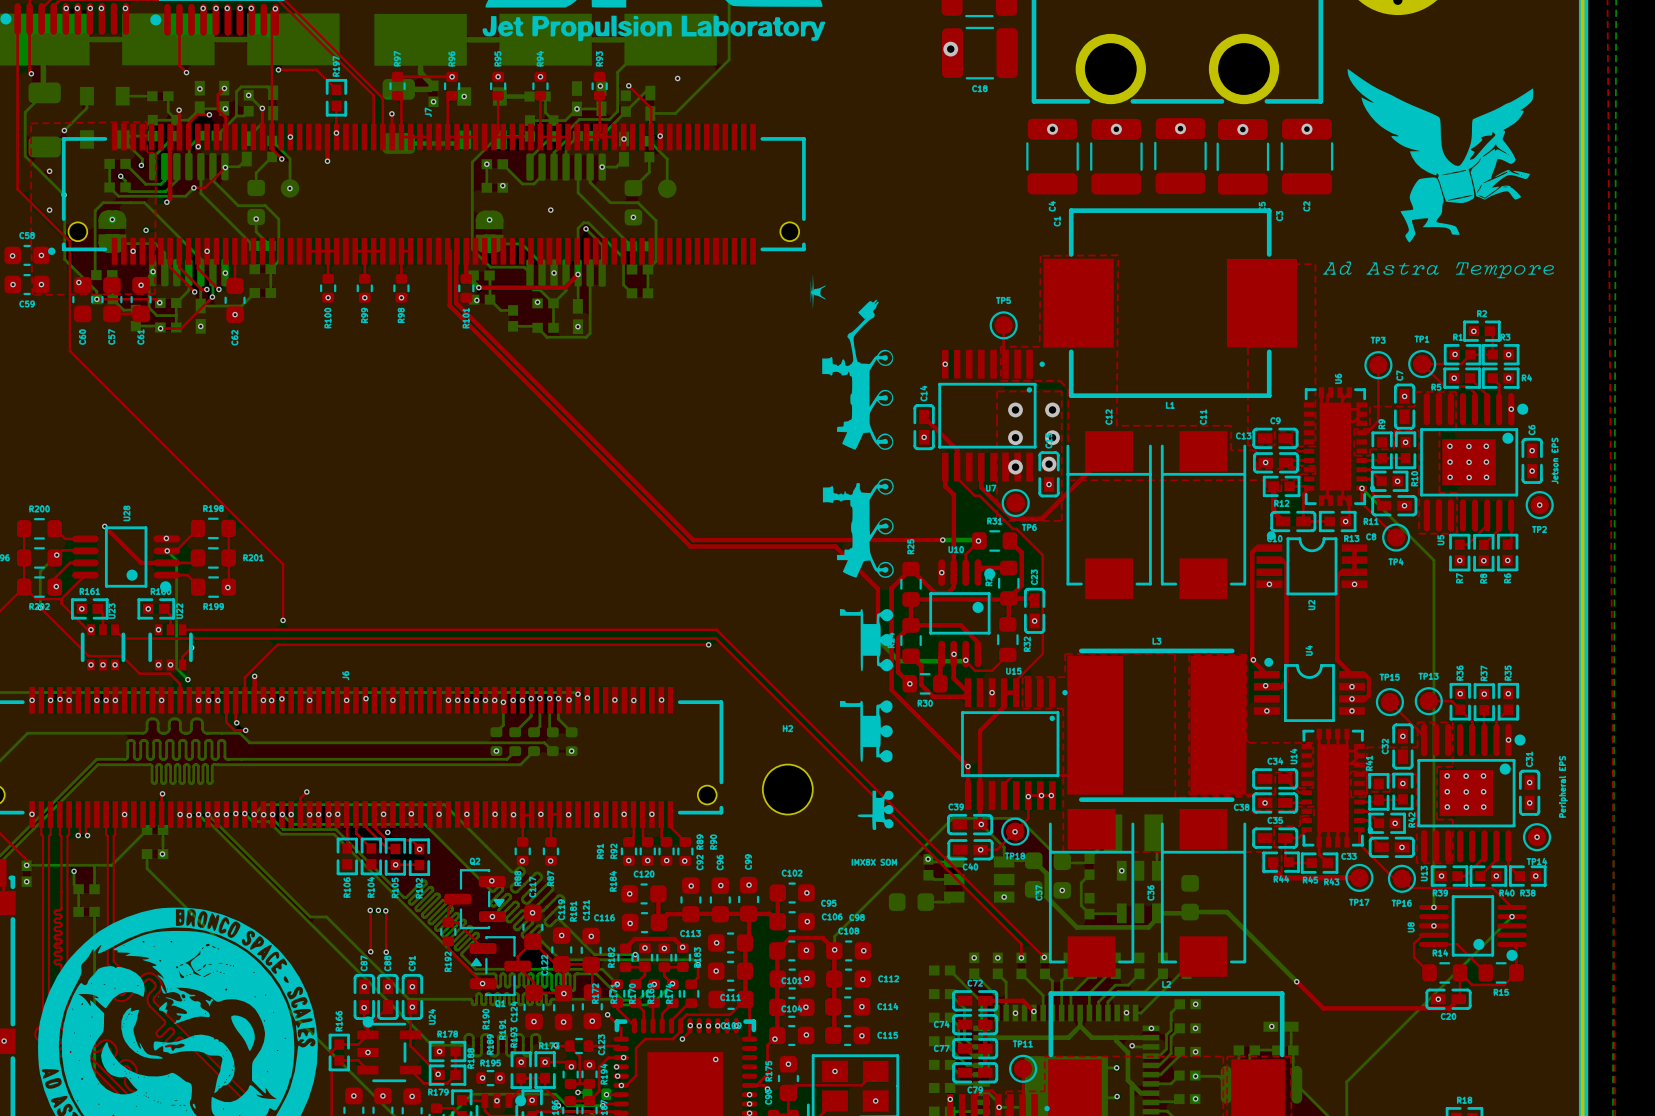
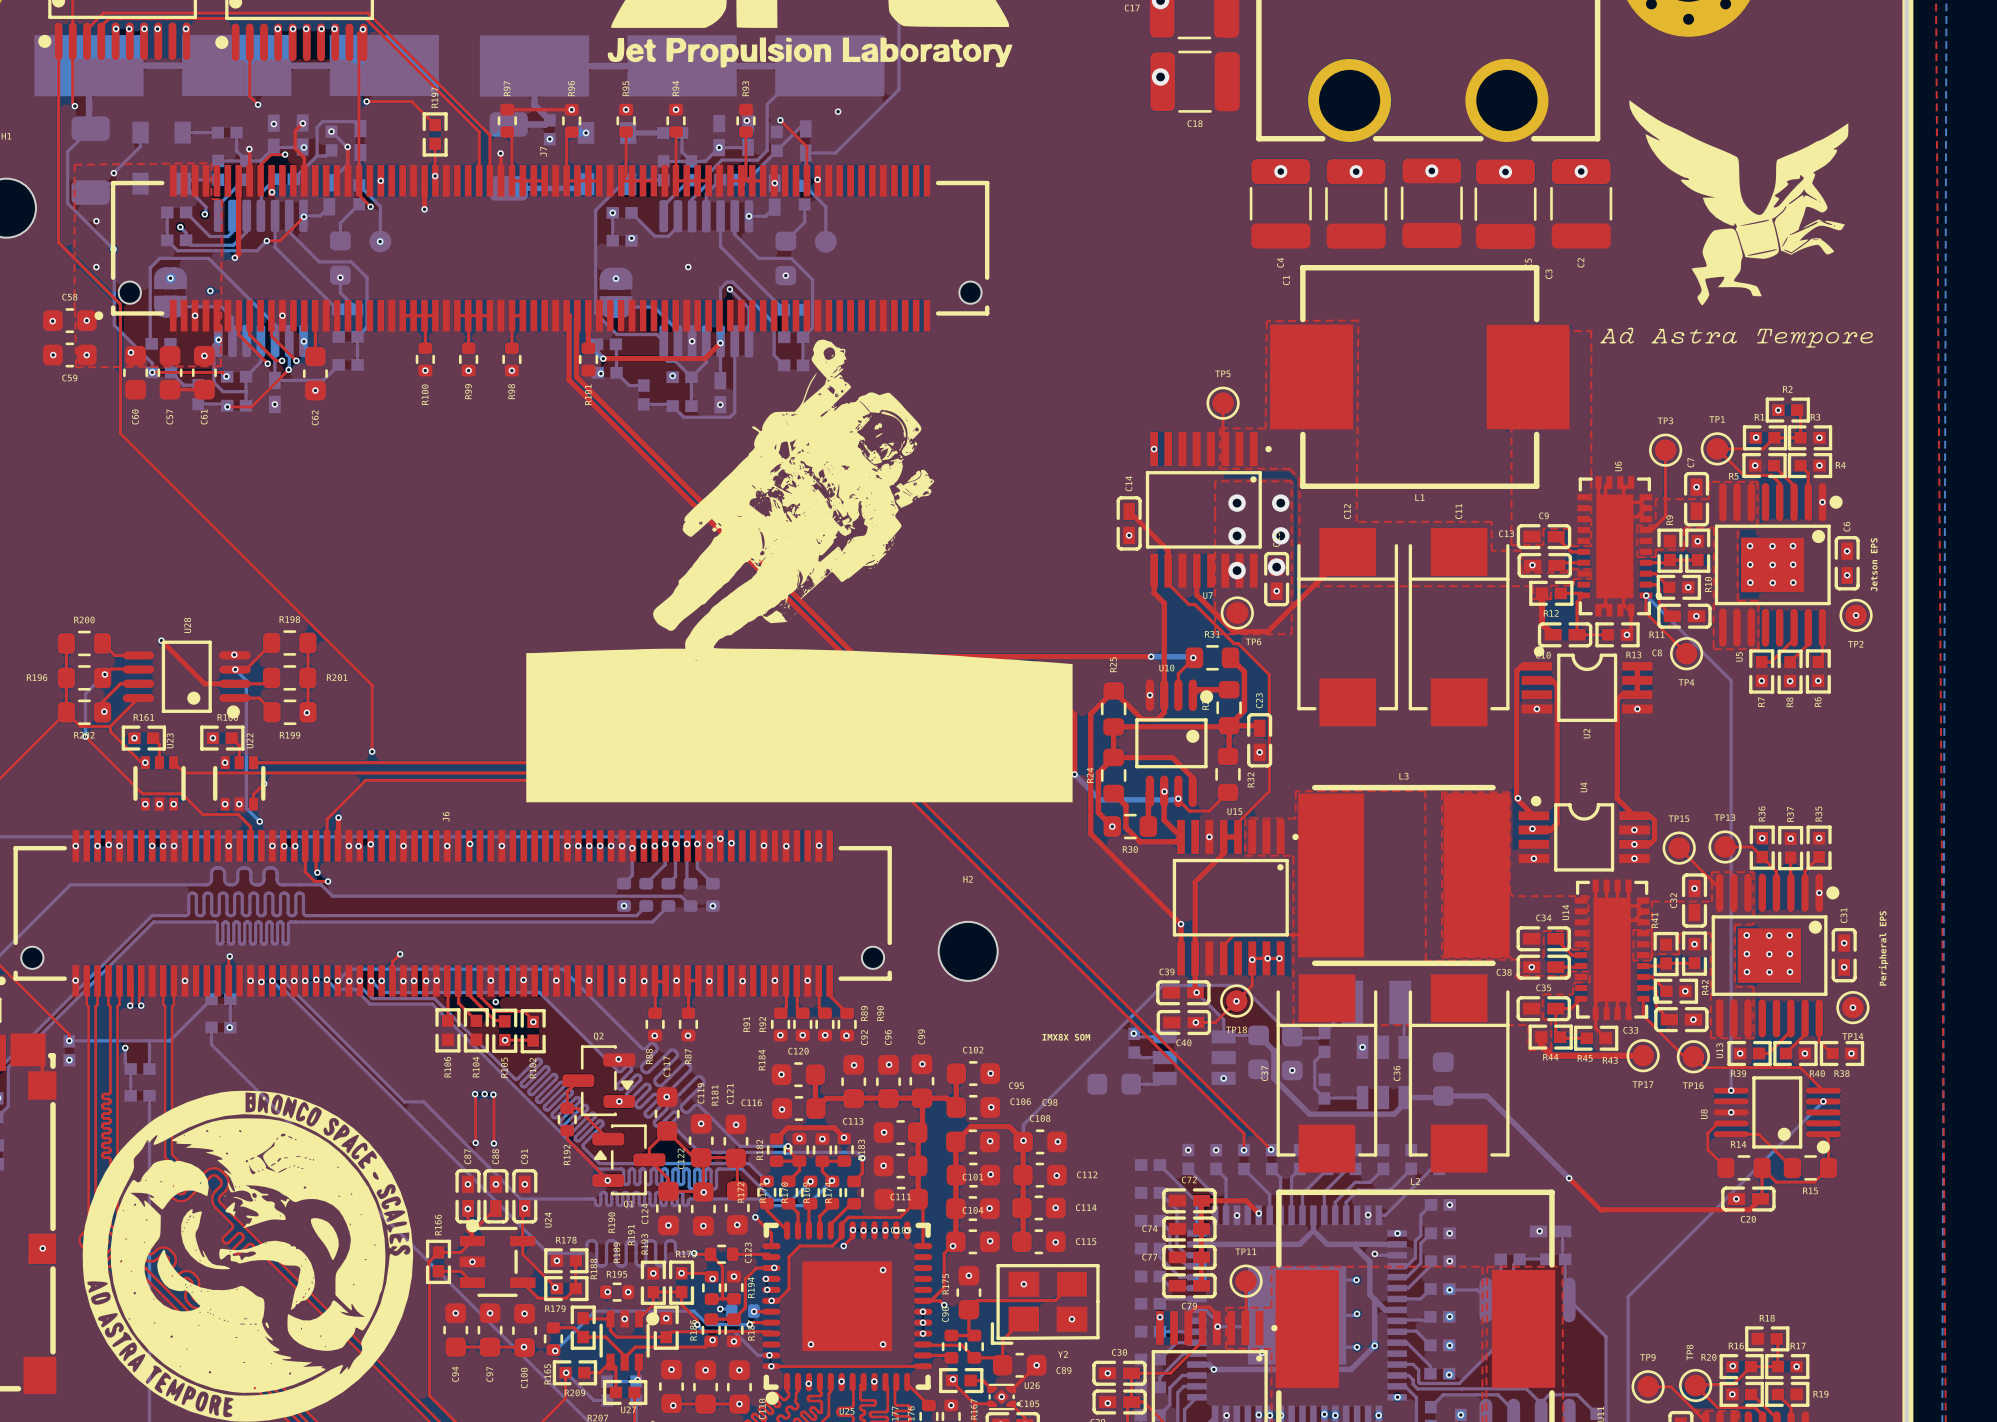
drawing: none -> [526, 339, 1073, 803]
drawing: [810, 273, 894, 830] -> none

